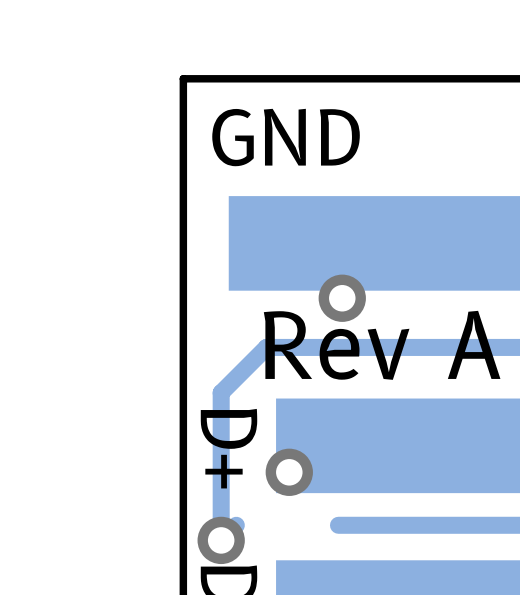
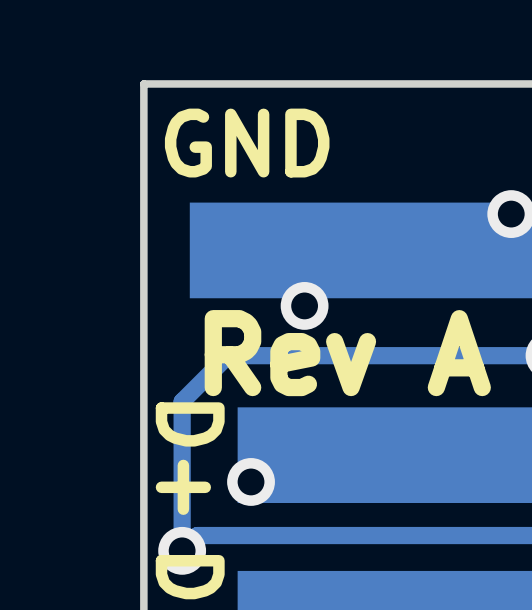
track: none -> (300, 535) (197, 535)

